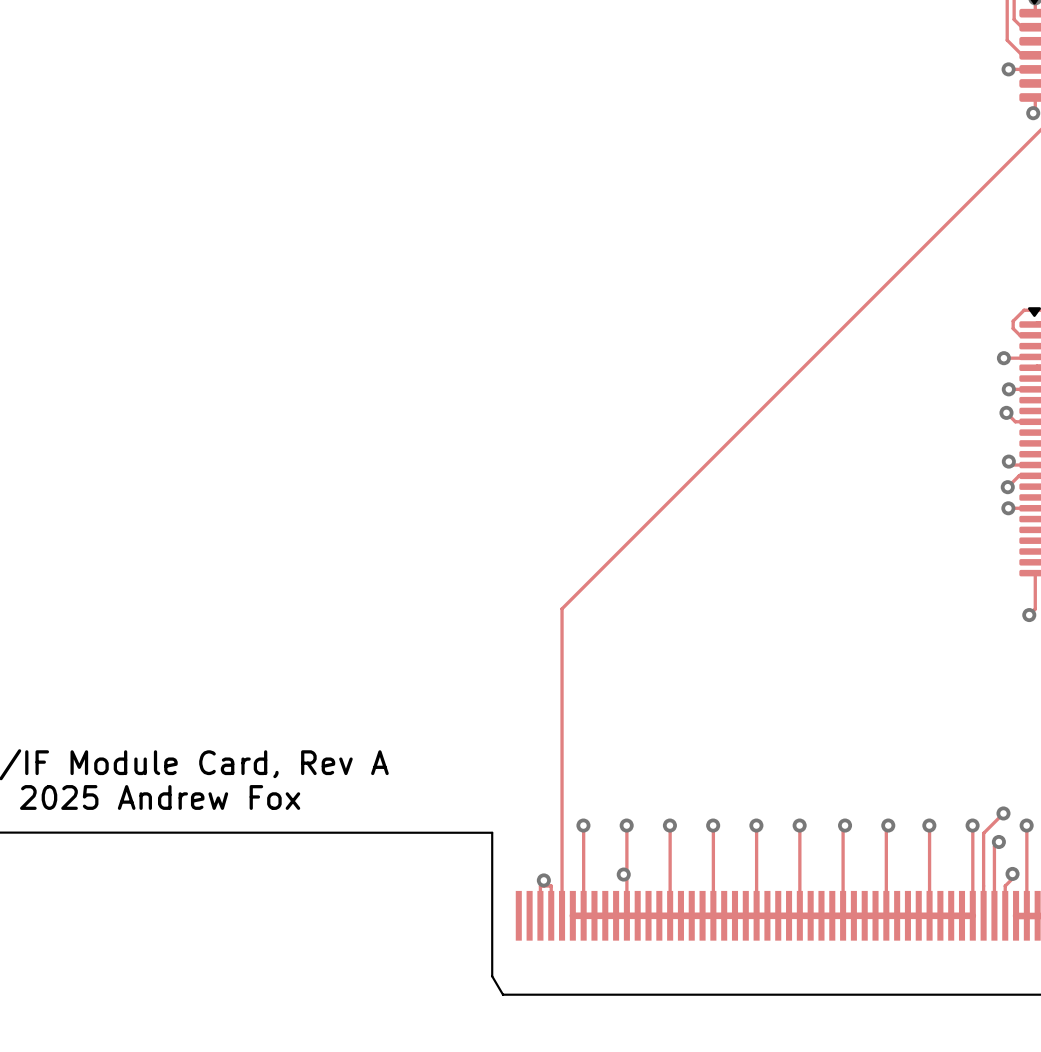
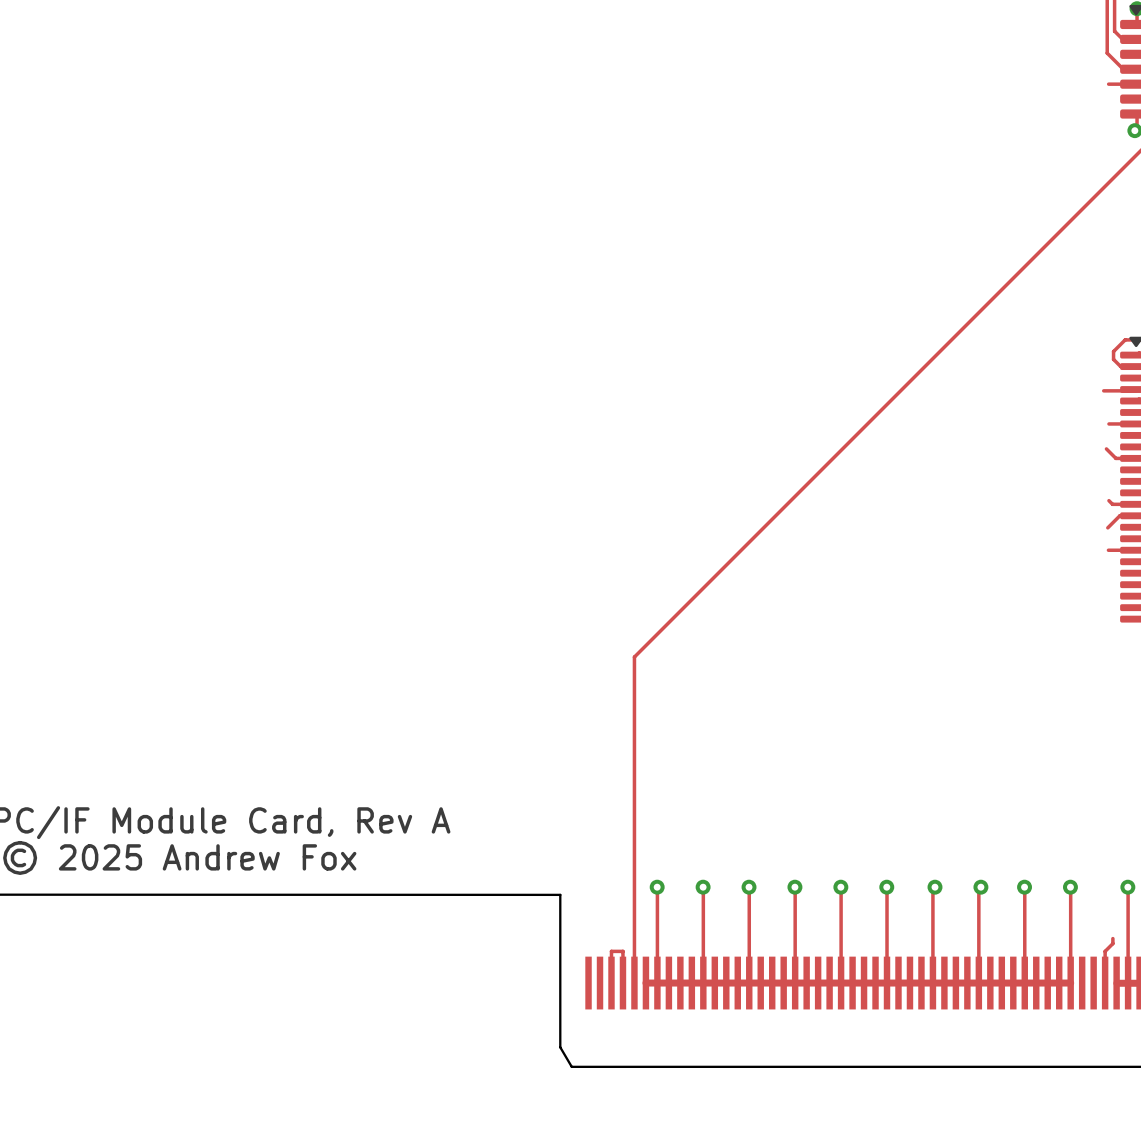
via: (1008, 69) -> none
via: (1003, 358) -> none
via: (1008, 389) -> none
via: (1006, 412) -> none
via: (1008, 461) -> none
via: (1007, 487) -> none
via: (1008, 508) -> none
track: (1035, 573) (1035, 609) (1029, 615) -> none
via: (1029, 615) -> none
track: (1003, 813) (983, 833) (983, 915) -> none
via: (1003, 813) -> none
track: (998, 841) (994, 846) (994, 915) -> none
via: (998, 841) -> none
via: (1012, 873) -> none
via: (623, 874) -> none
via: (543, 880) -> none

